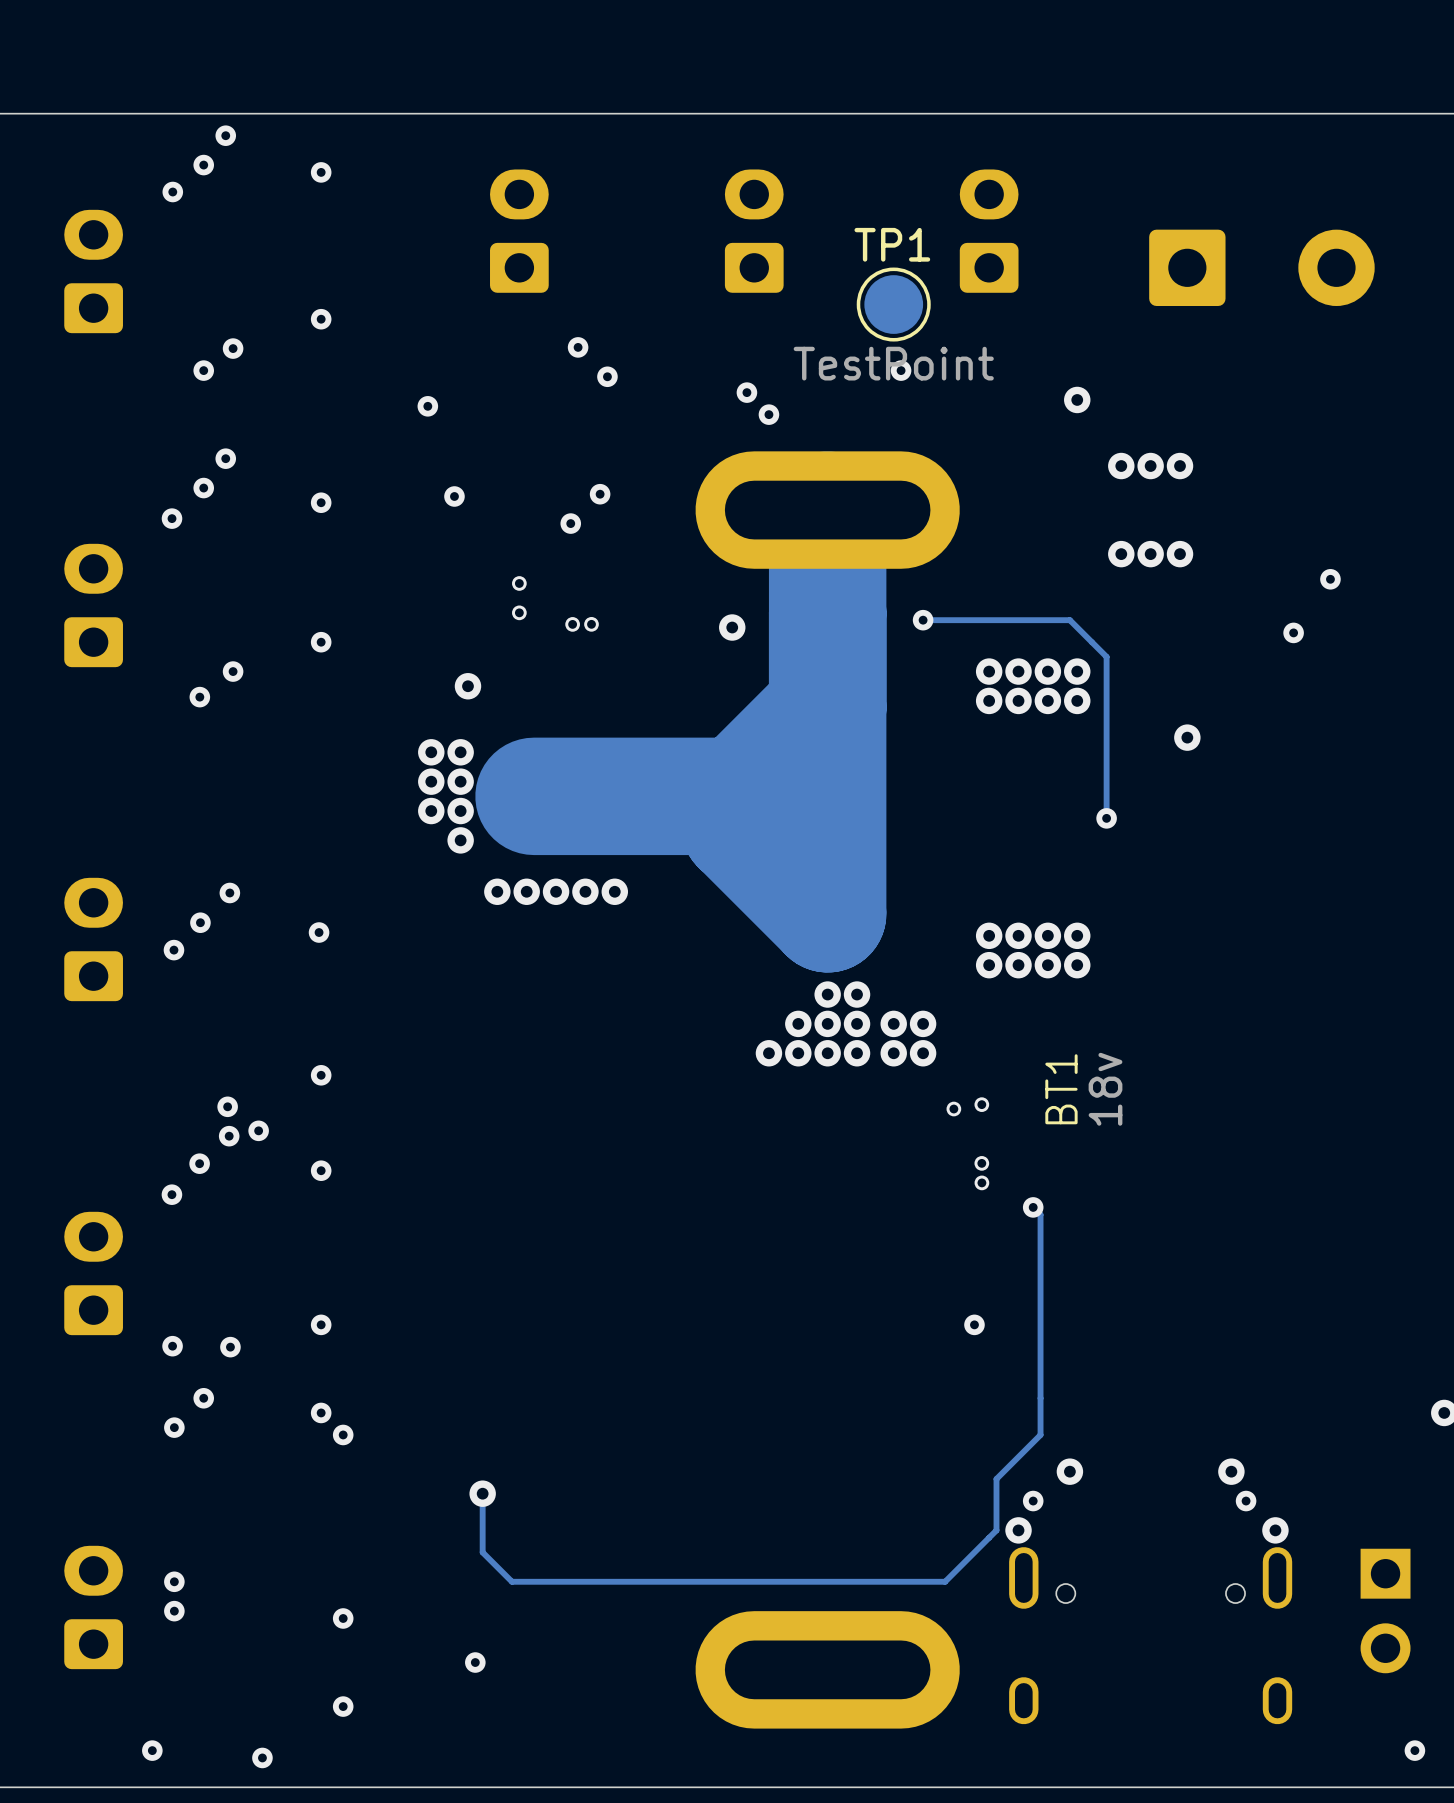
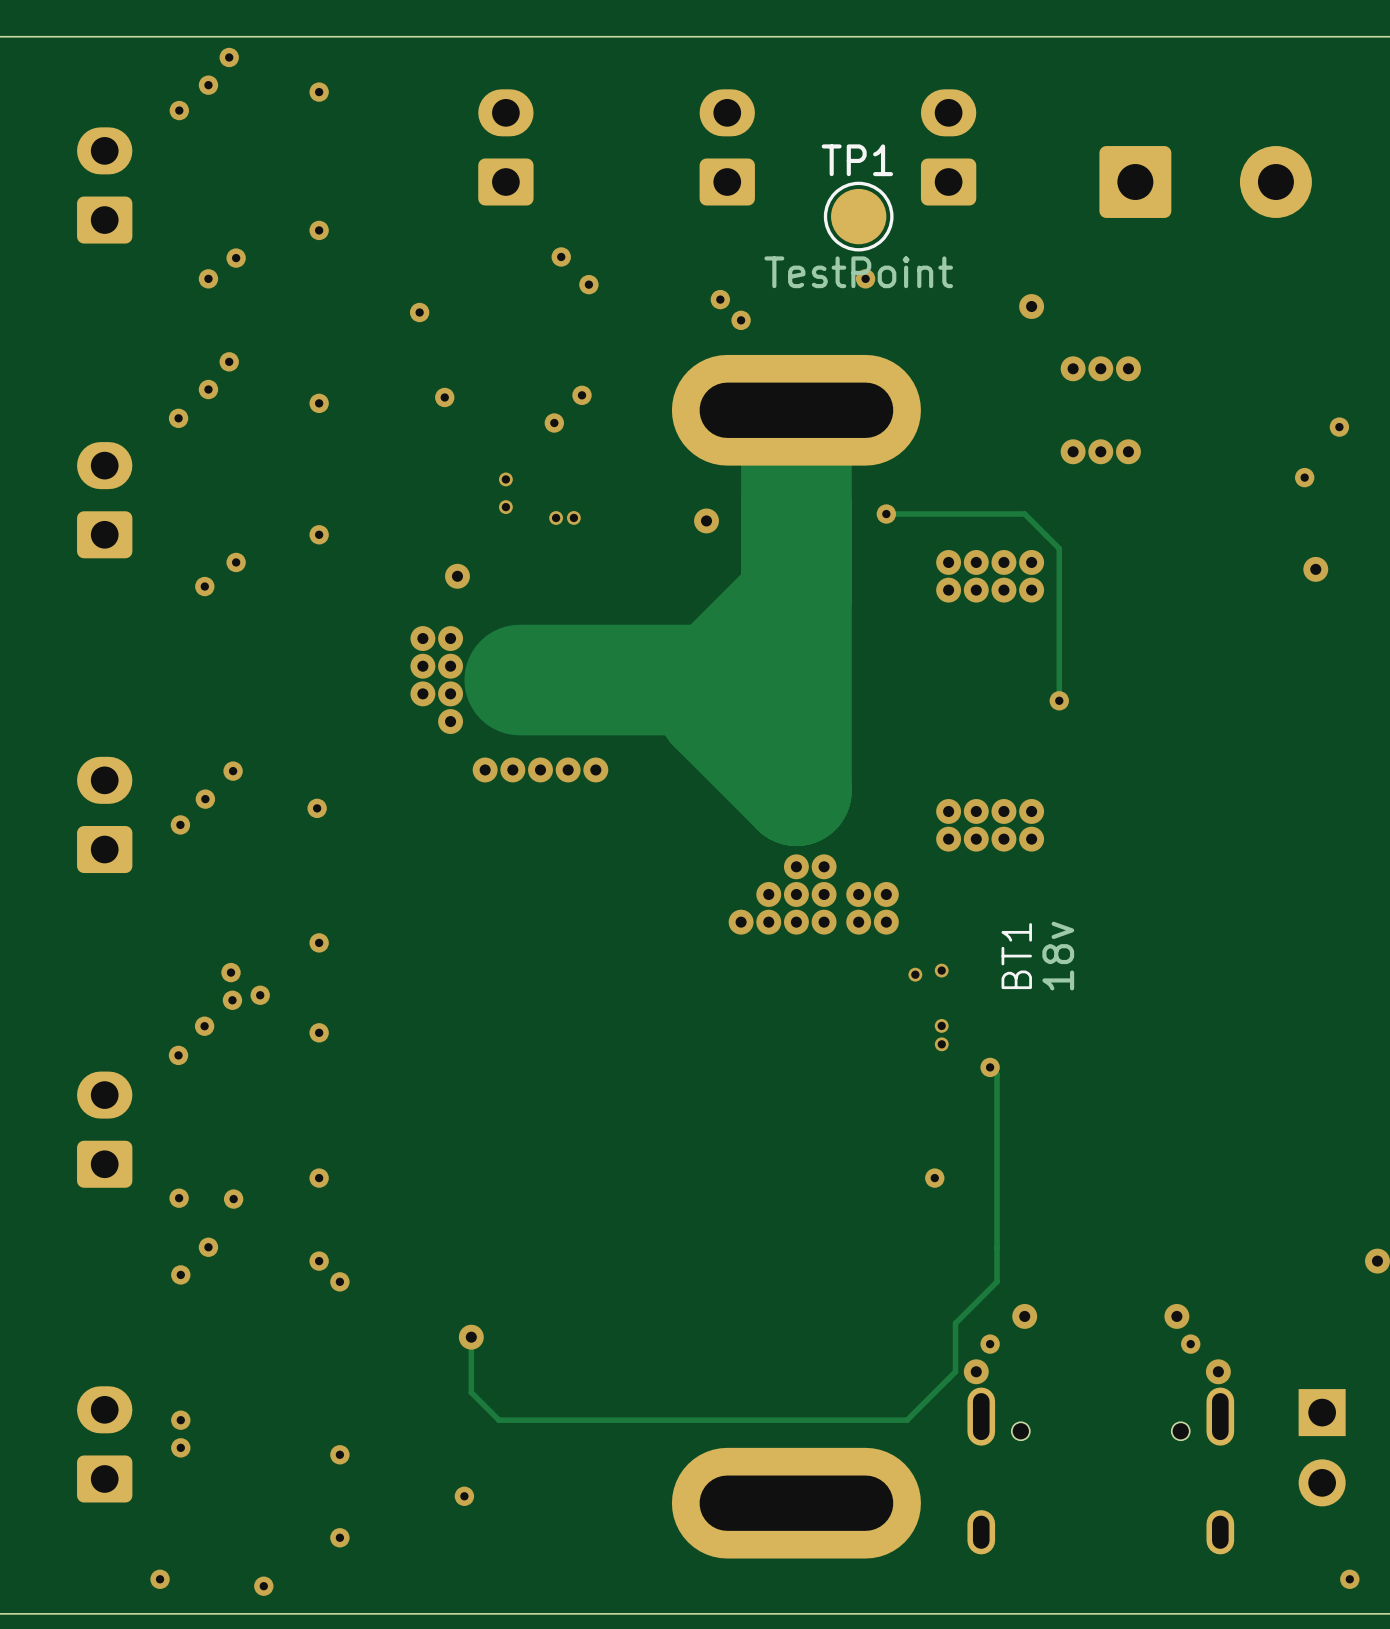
via: none -> (1339, 427)
via position: (1330, 579) -> (1304, 477)
via: (1293, 632) -> none
via: none -> (1315, 569)
via: (1187, 737) -> none

